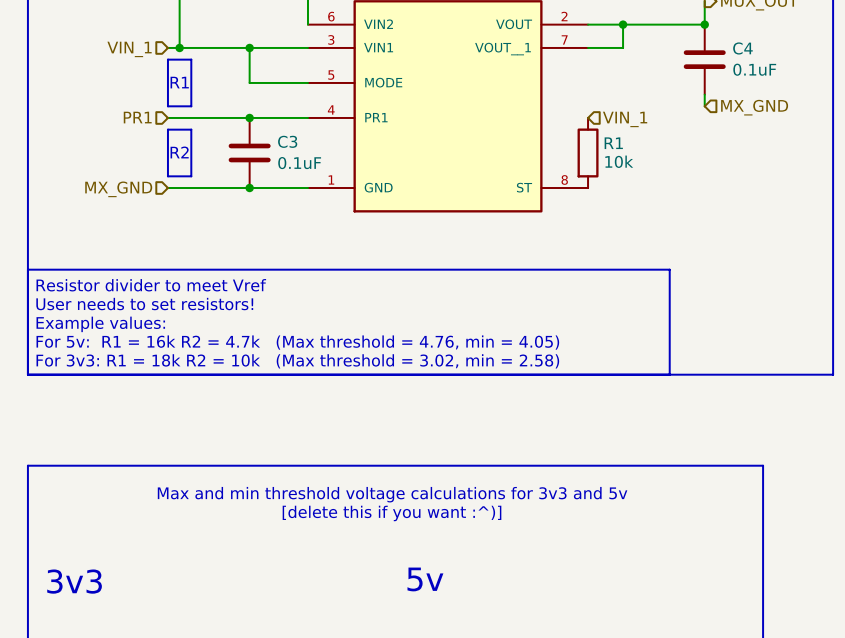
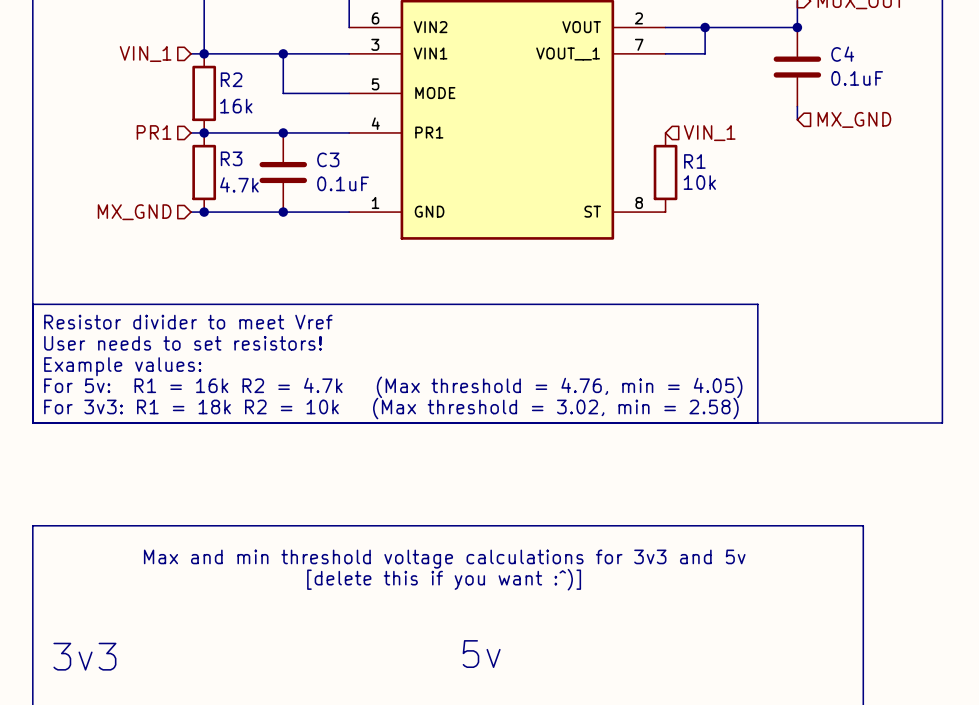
line: (167, 59) (191, 59) (191, 106) (167, 106) (167, 59) -> none
text: R1 (179, 82) -> none
R2: none -> 16k (204, 93)
junction: none -> (204, 132)
line: (167, 129) (167, 176) (191, 176) (191, 129) (167, 129) -> none
text: R2 (179, 152) -> none
R3: none -> 4.7k (204, 172)
junction: none -> (204, 212)

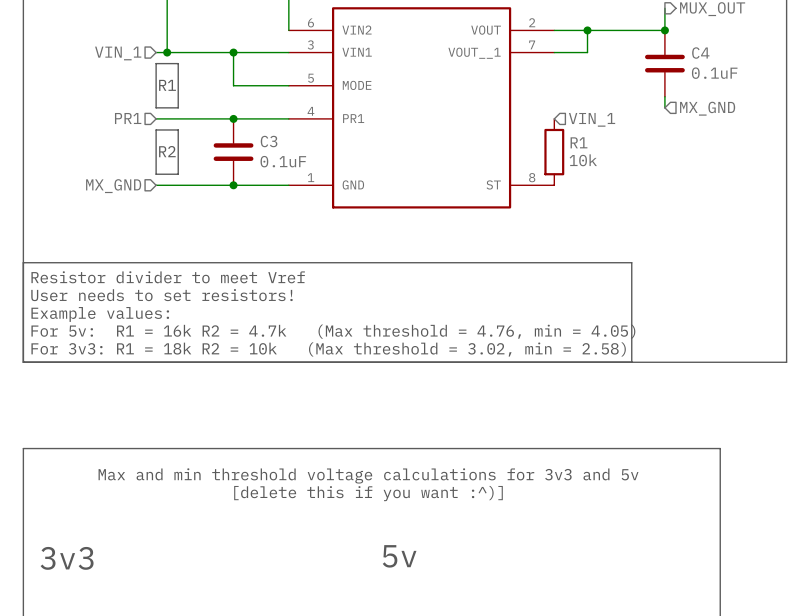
line: none -> (156, 63) (178, 63) (178, 107) (156, 107) (156, 63)
text: none -> R1 (167, 85)
R2: 16k (204, 93) -> none
junction: (204, 132) -> none
line: none -> (156, 129) (156, 174) (178, 174) (178, 129) (156, 129)
text: none -> R2 (167, 151)
R3: 4.7k (204, 172) -> none
junction: (204, 212) -> none

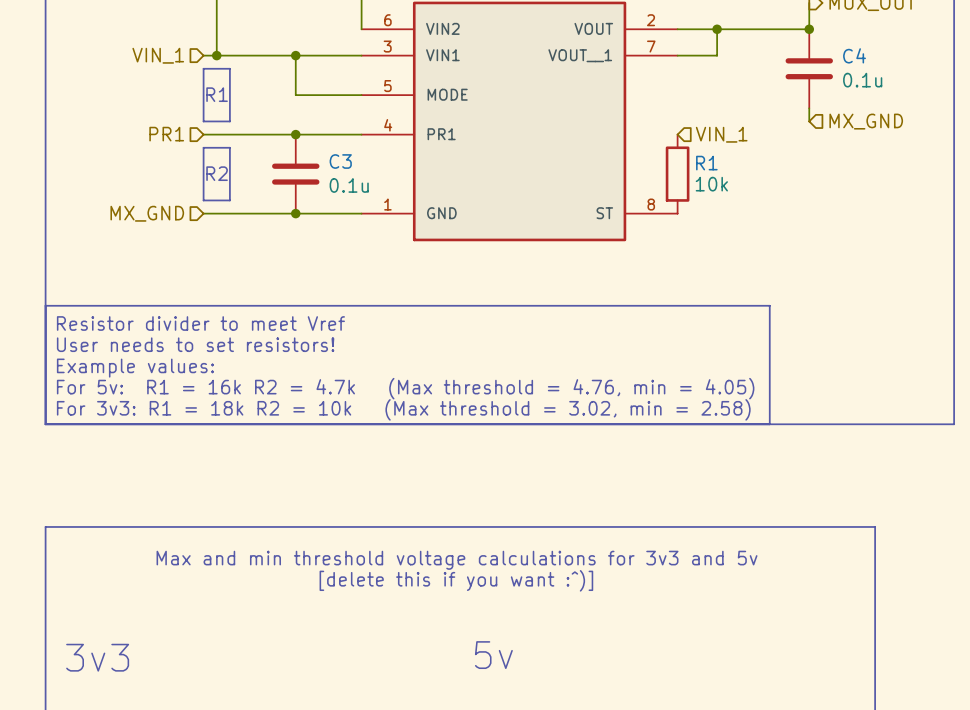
C4 value: 0.1uF (714, 73) -> 0.1u (862, 80)
C3 value: 0.1uF (283, 161) -> 0.1u (349, 185)

